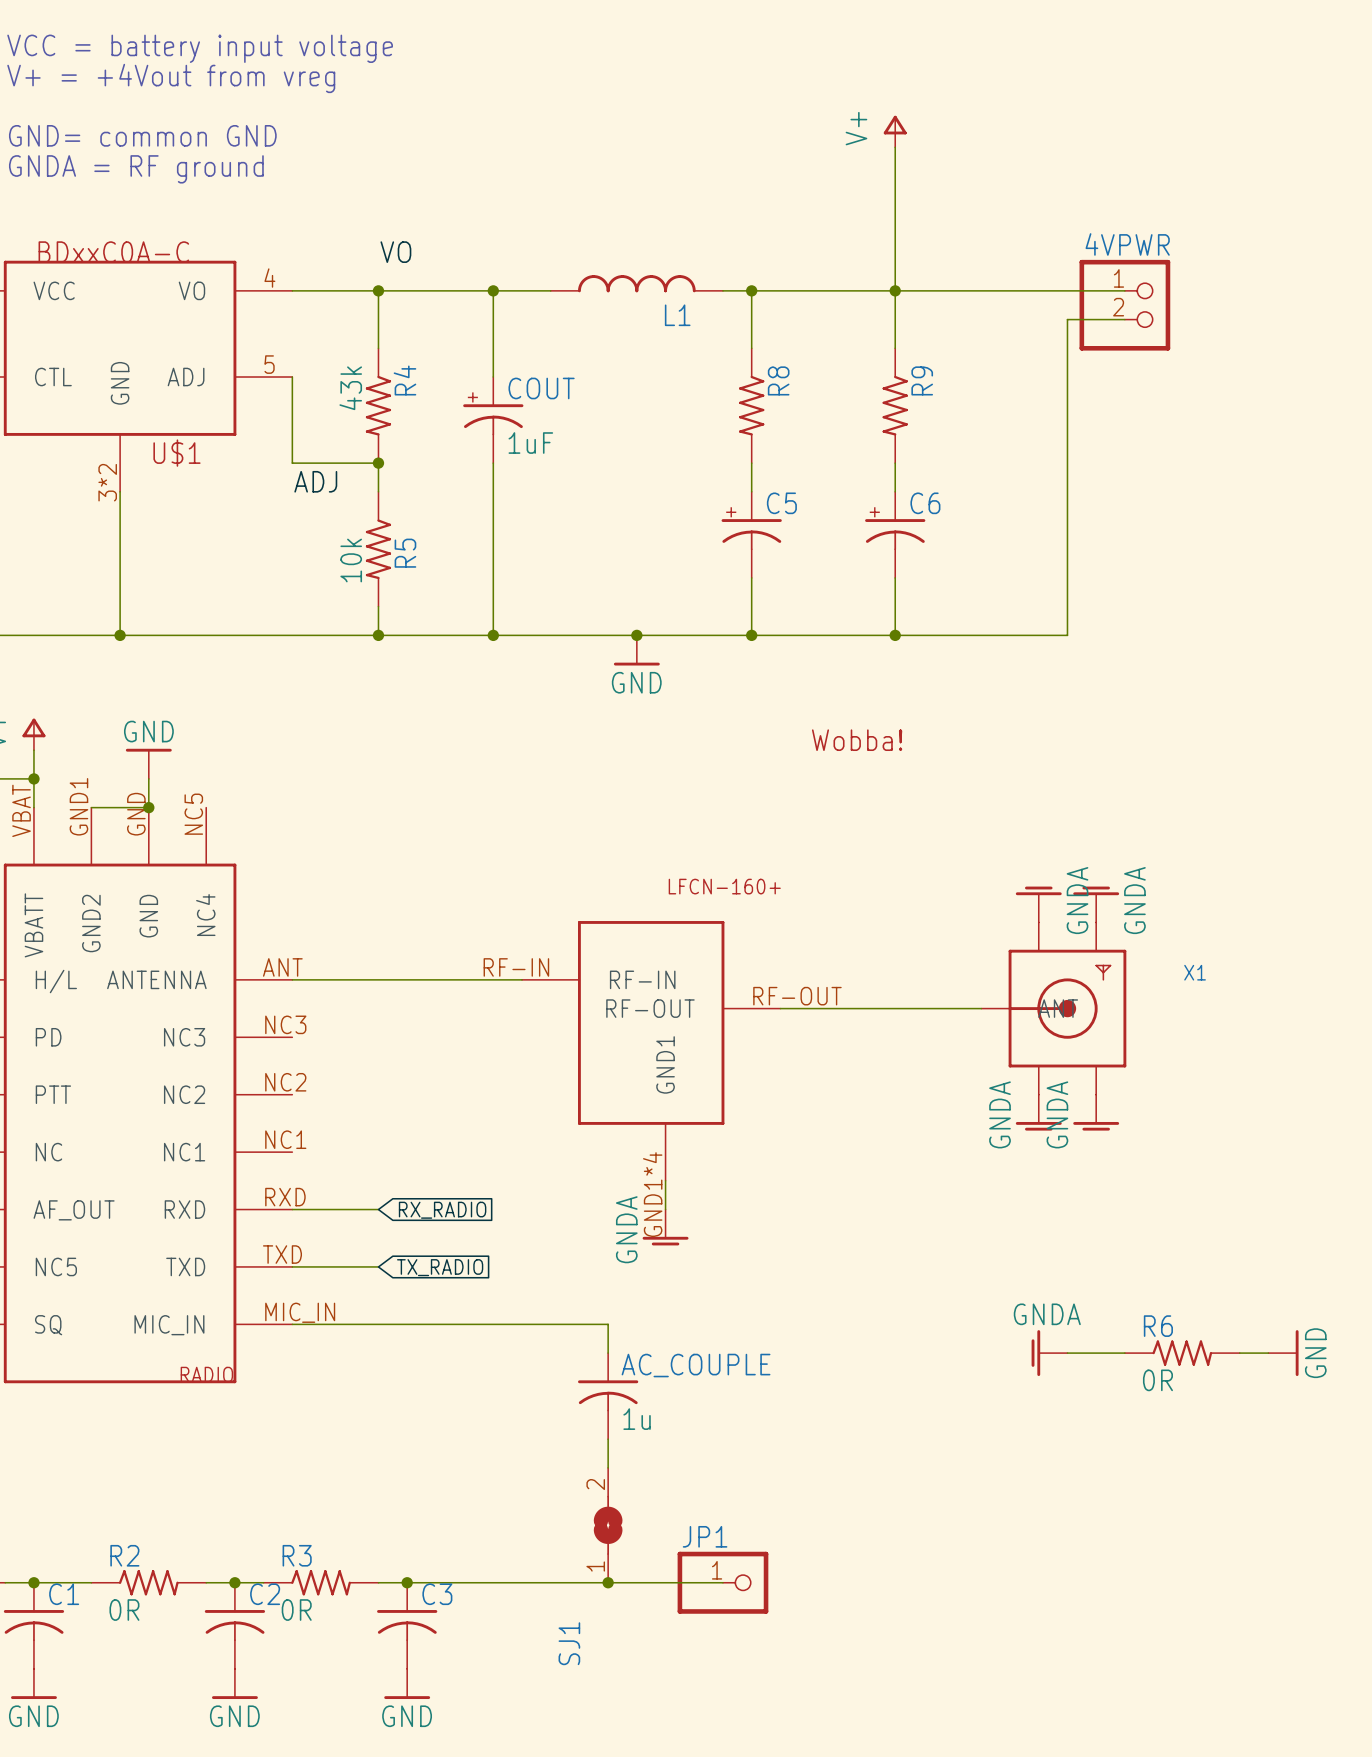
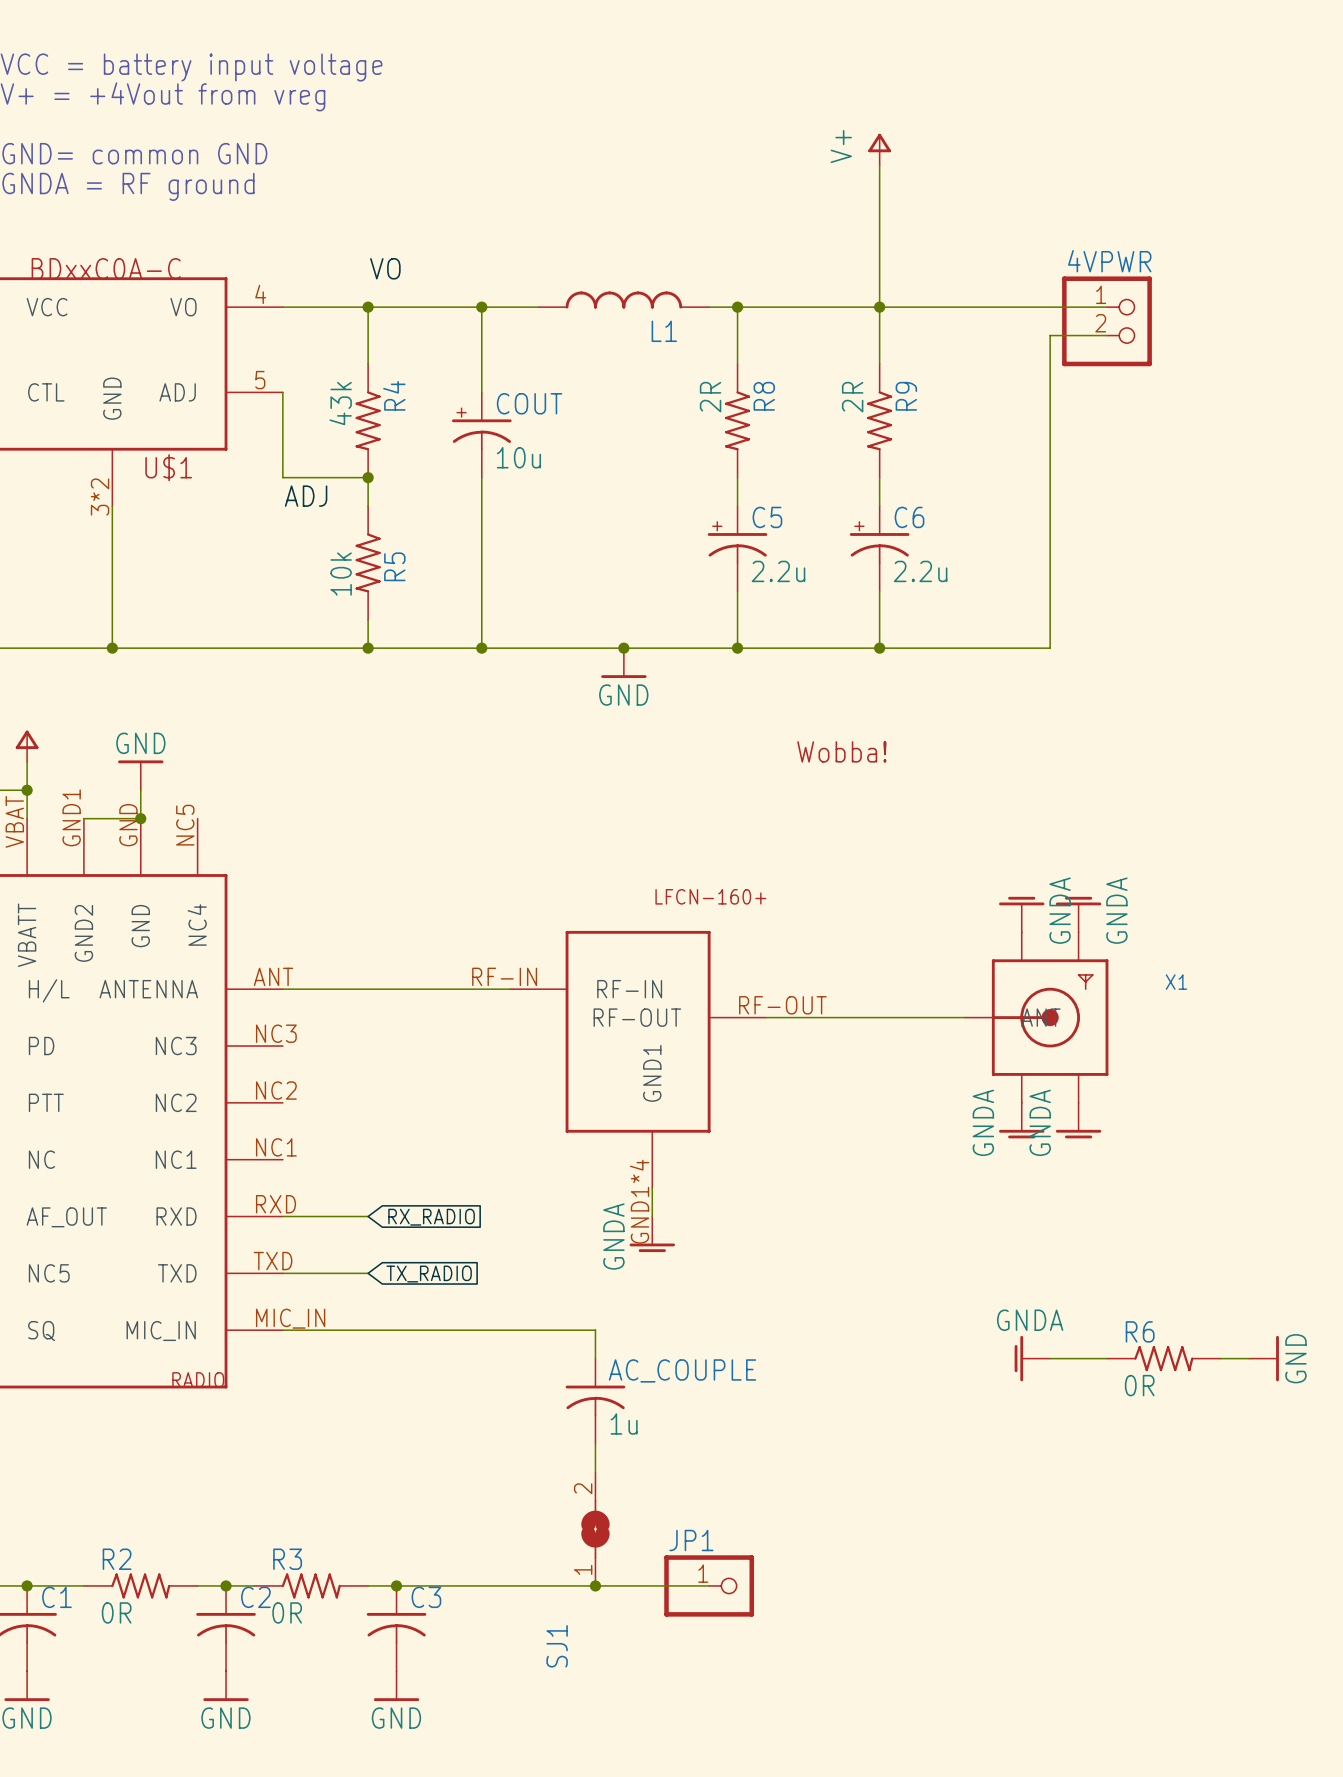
R8 value: none -> 2R (710, 397)
R9 value: none -> 2R (852, 397)
COUT value: 1uF (530, 443) -> 10u (518, 457)
C5 value: none -> 2.2u (778, 571)
C6 value: none -> 2.2u (920, 571)

